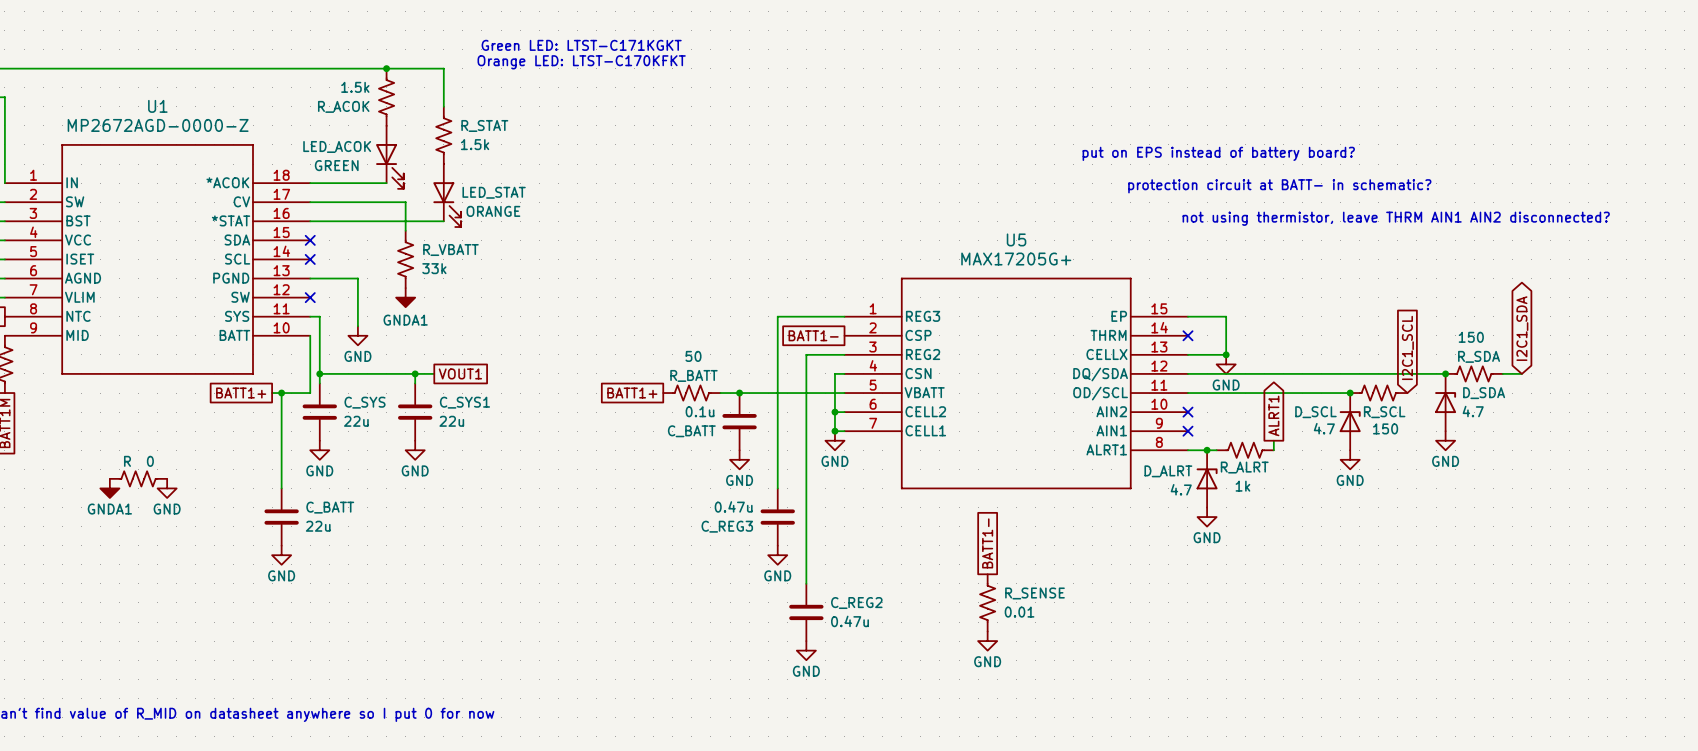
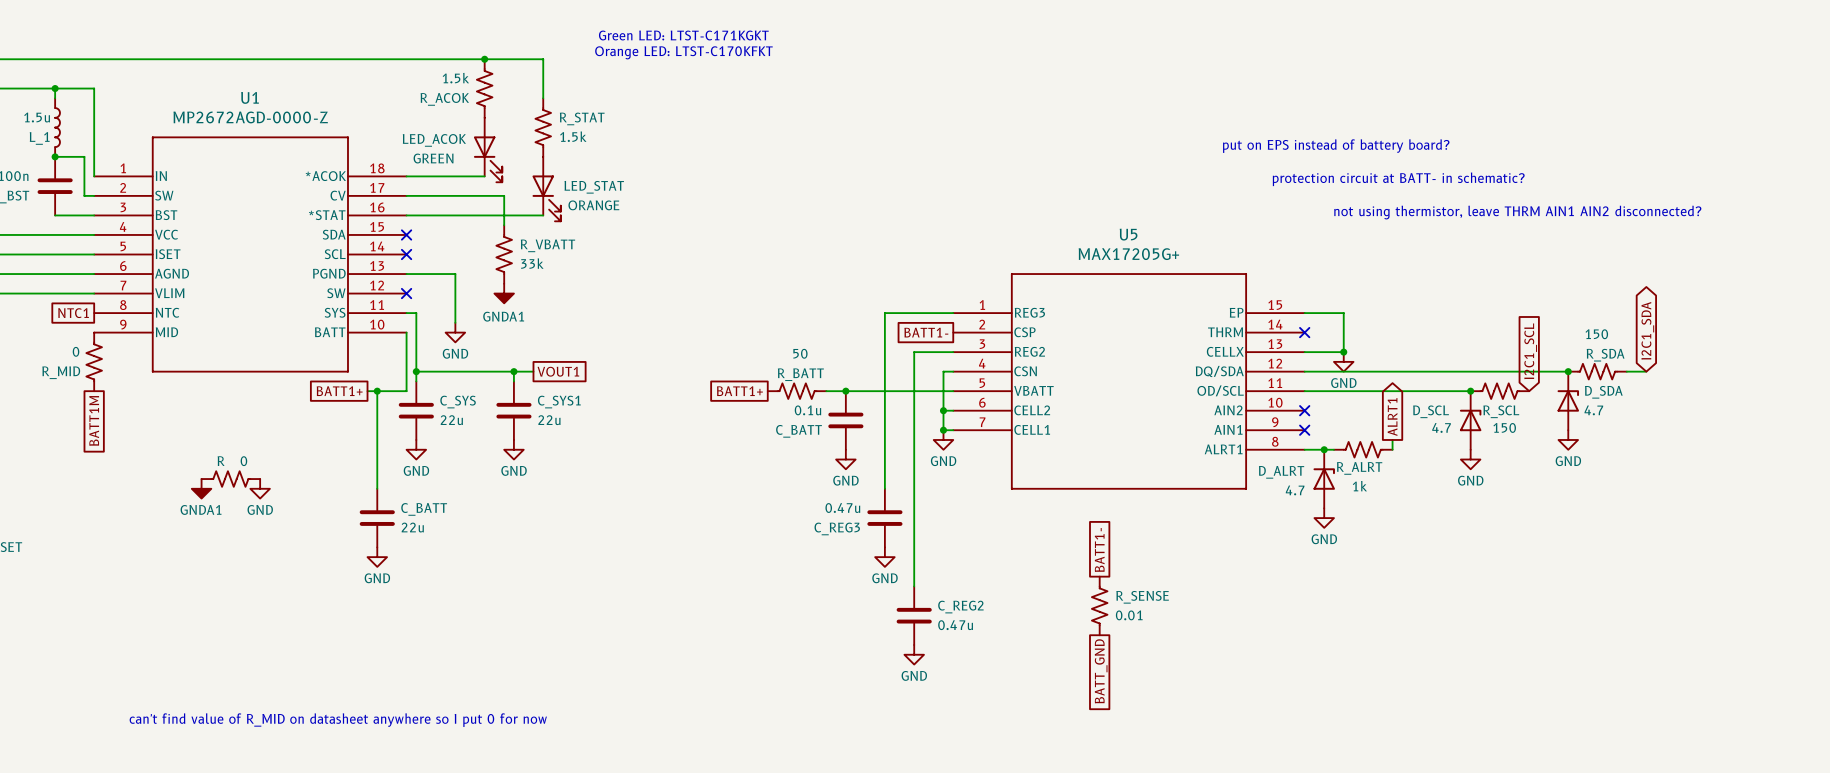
power symbol: GND (987, 641) -> none
global label: none -> BATT_GND (1101, 671)

